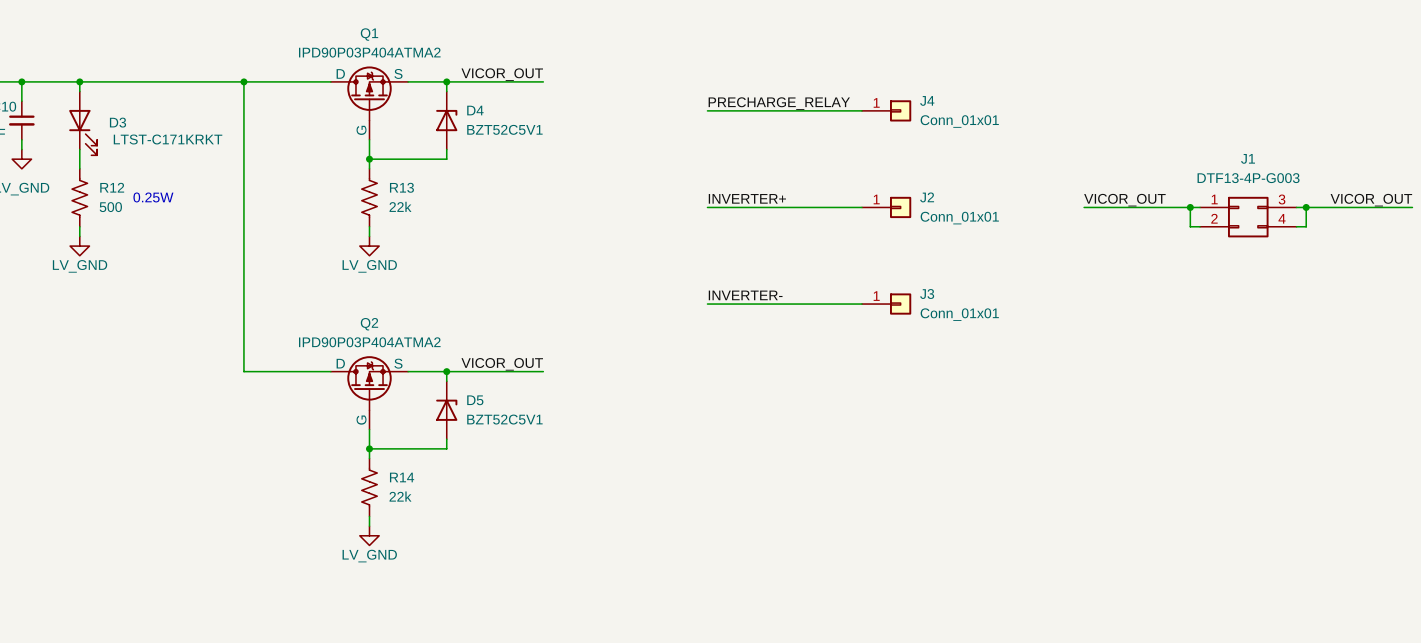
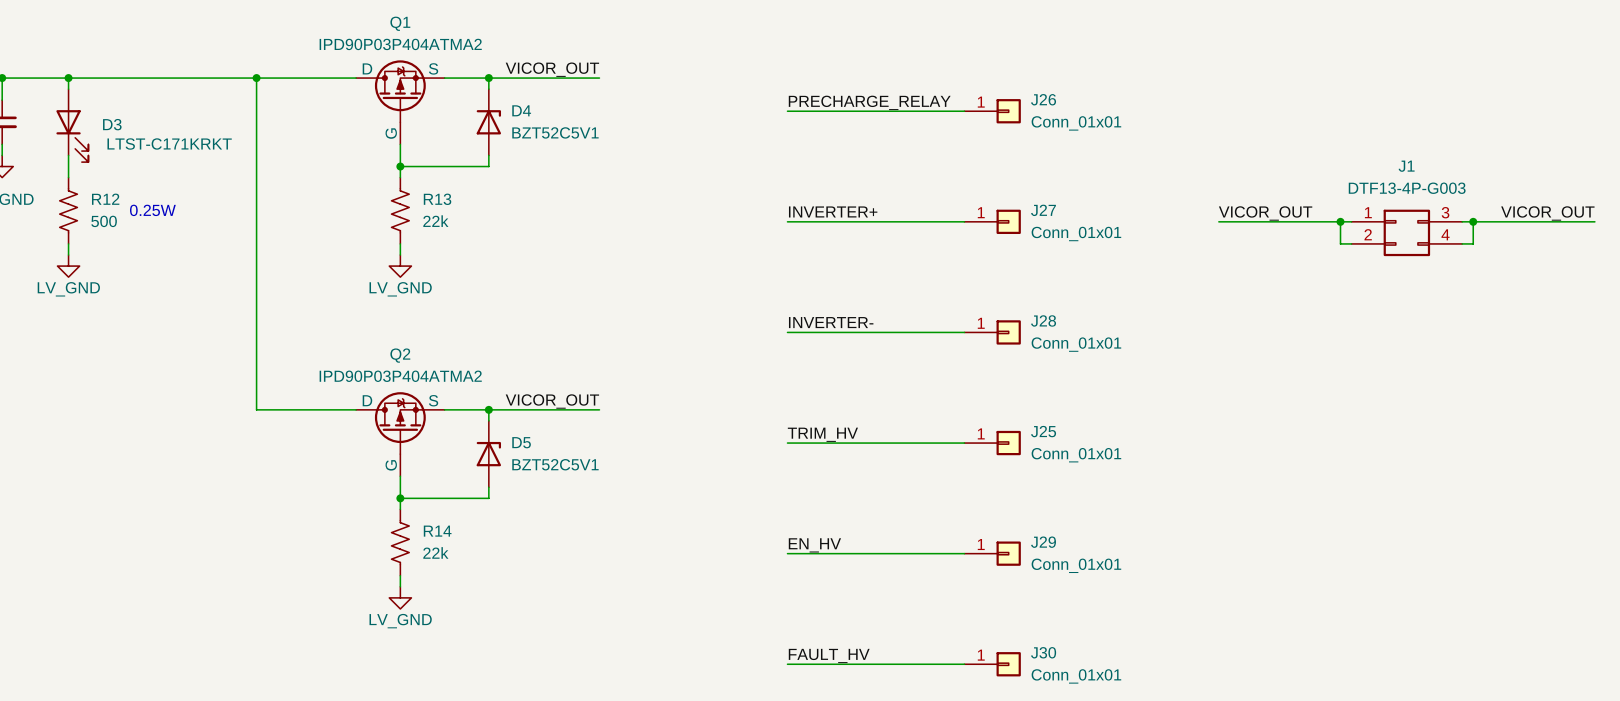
J4 name: J4 (927, 100) -> J26 (1043, 99)
J2 name: J2 (927, 197) -> J27 (1043, 210)
J3 name: J3 (927, 294) -> J28 (1043, 320)
label: none -> TRIM_HV (822, 434)
wire: none -> (787, 443) (964, 443)
J25: none -> Conn_01x01 (992, 443)
label: none -> EN_HV (814, 545)
wire: none -> (787, 553) (964, 553)
J29: none -> Conn_01x01 (992, 553)
label: none -> FAULT_HV (829, 655)
wire: none -> (787, 664) (964, 664)
J30: none -> Conn_01x01 (992, 664)

